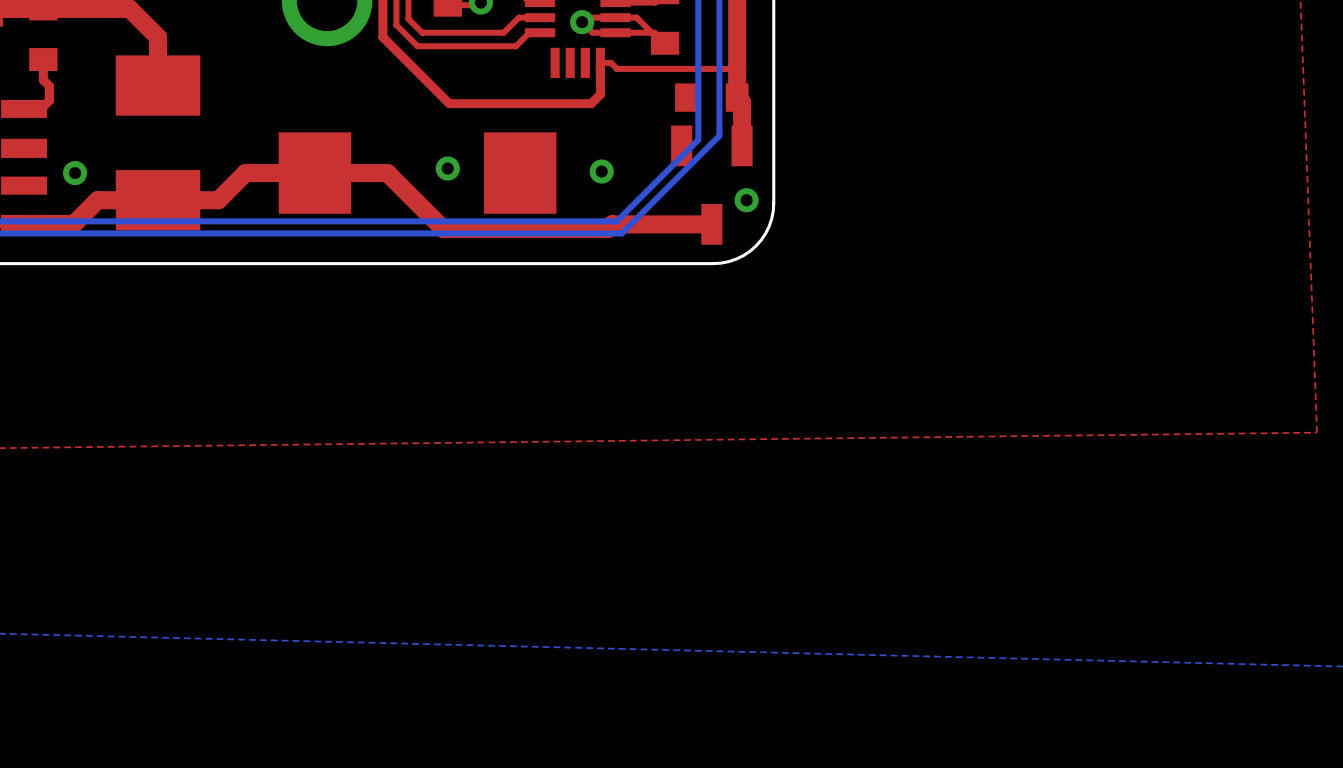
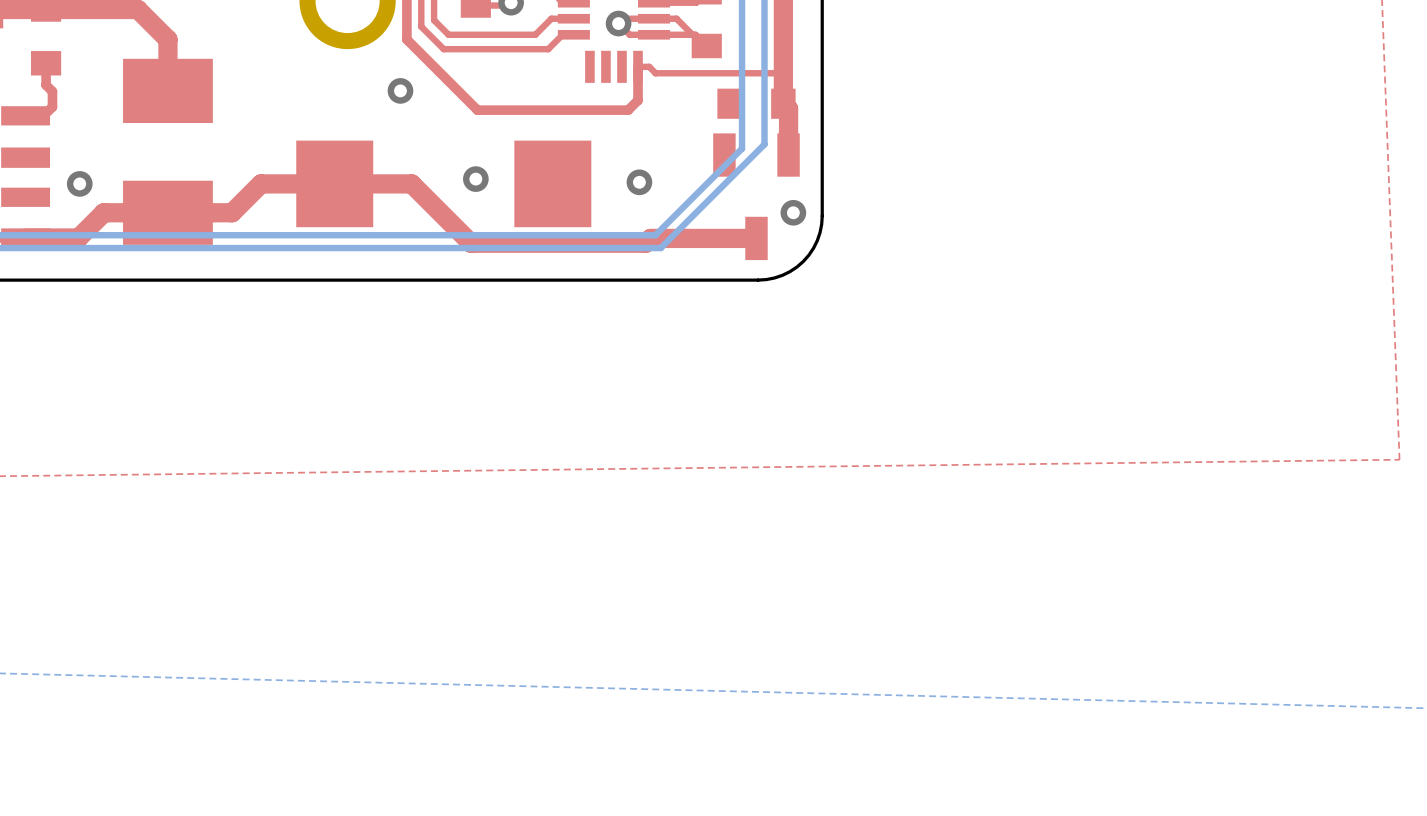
via: none -> (400, 90)

